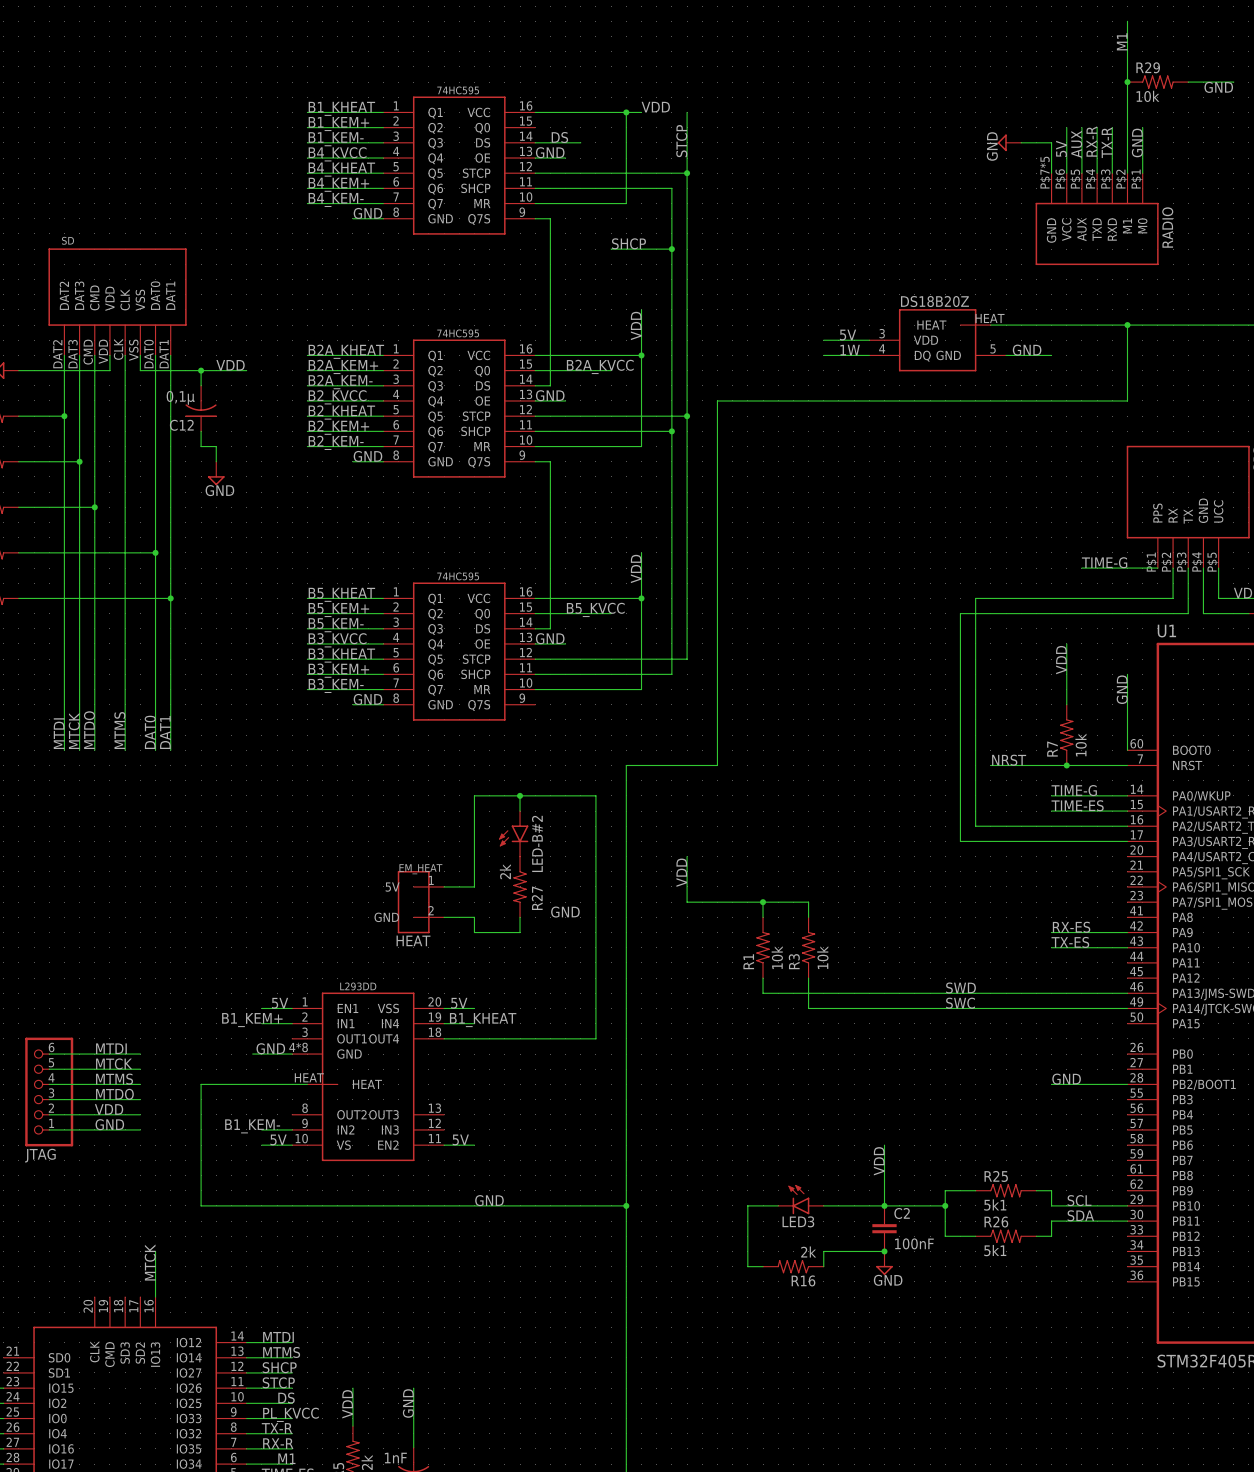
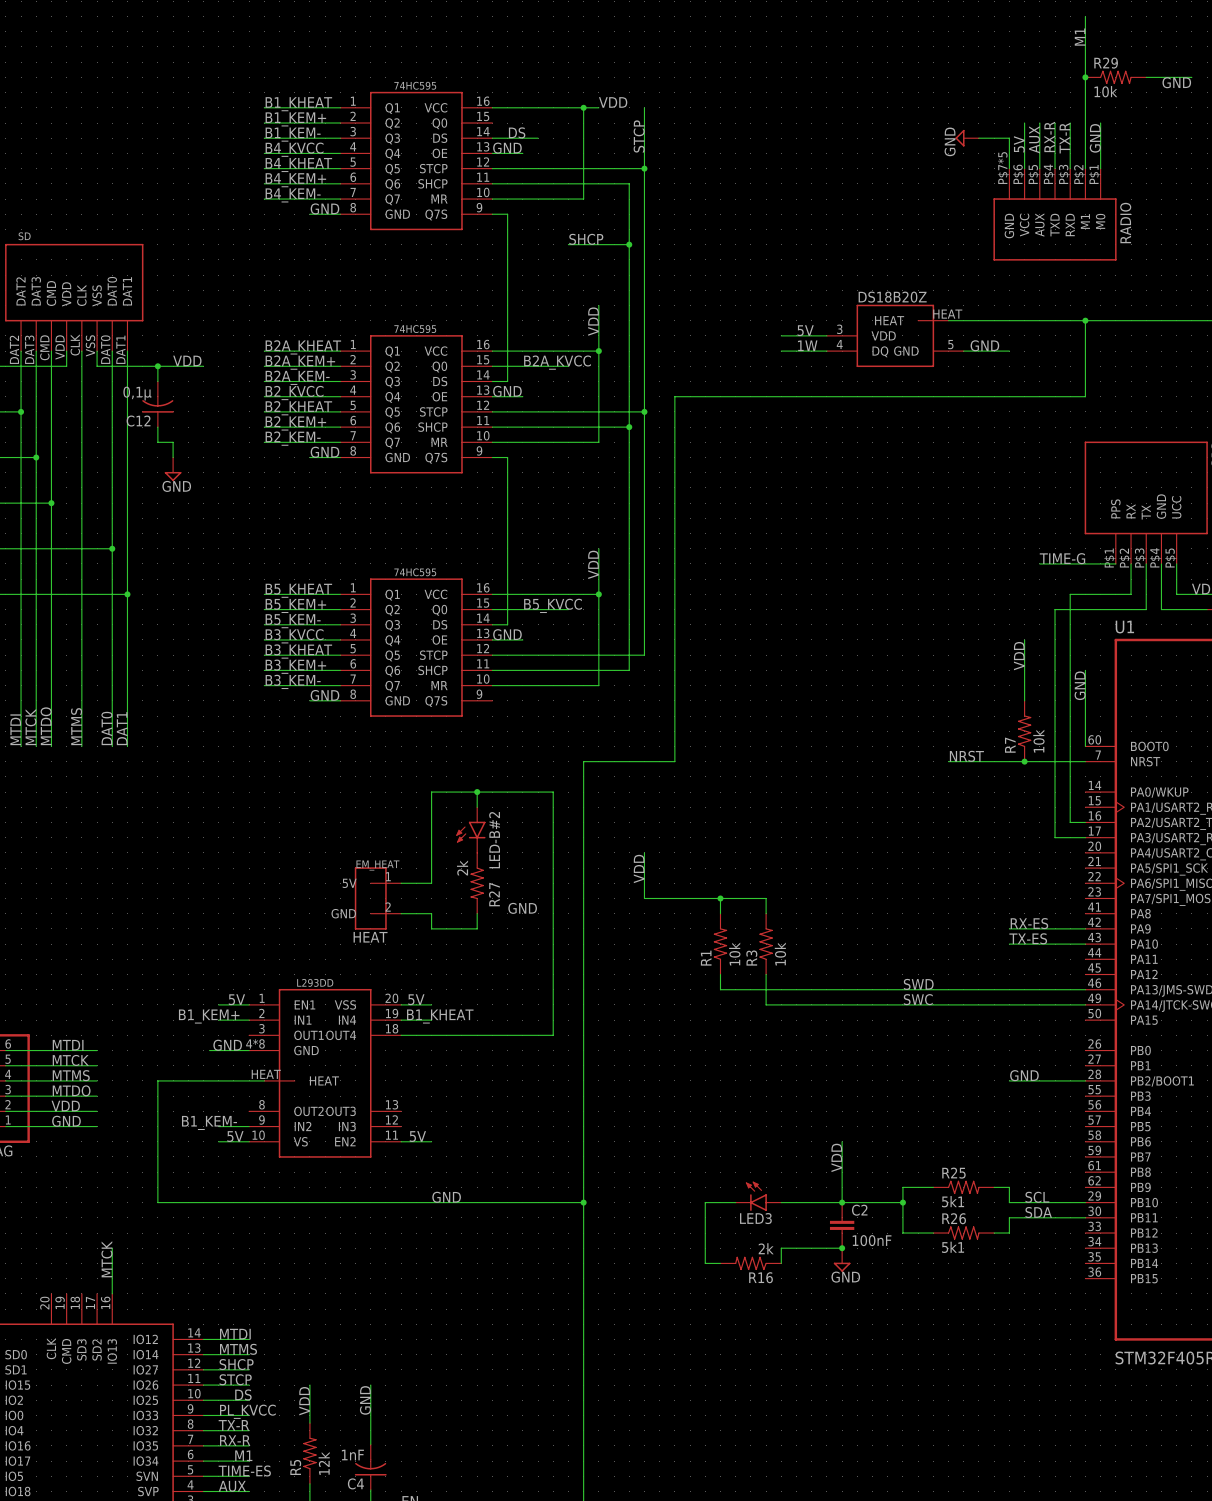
wire: (1112, 598) (975, 598) (975, 826) (1112, 826) -> (1070, 594) (1070, 822)
wire: (1097, 613) (960, 613) (960, 841) (1097, 841) -> (1055, 609) (1055, 837)
label: TIME-G (1074, 790) -> none
wire: (1051, 795) (1127, 795) -> none
label: TIME-ES (1077, 805) -> none
wire: (1051, 811) (1127, 811) -> none

